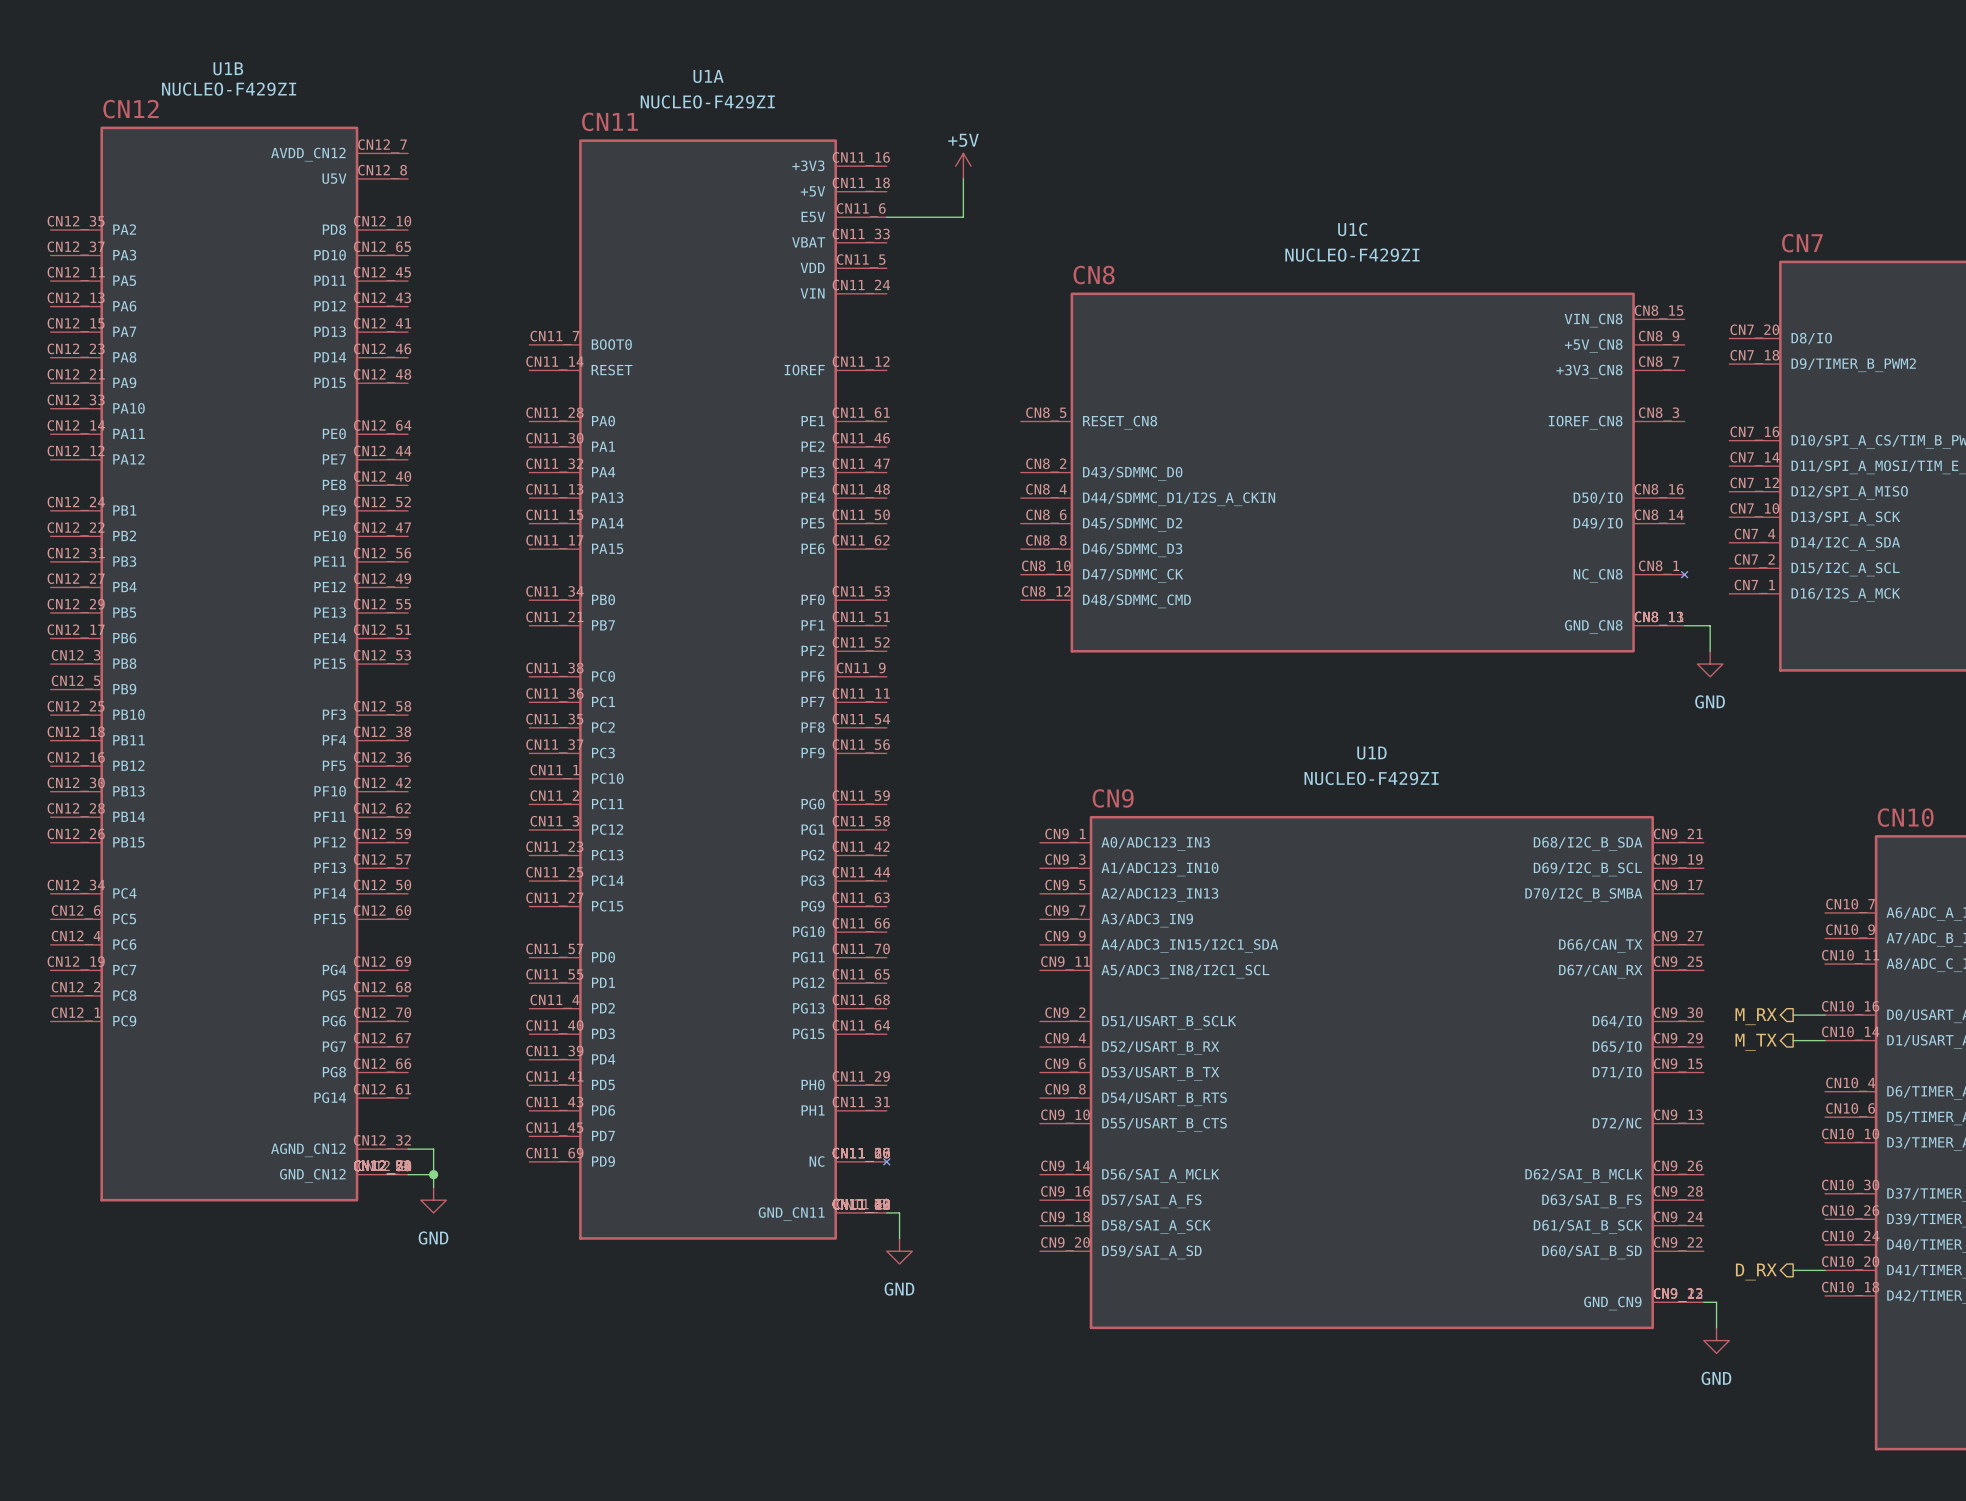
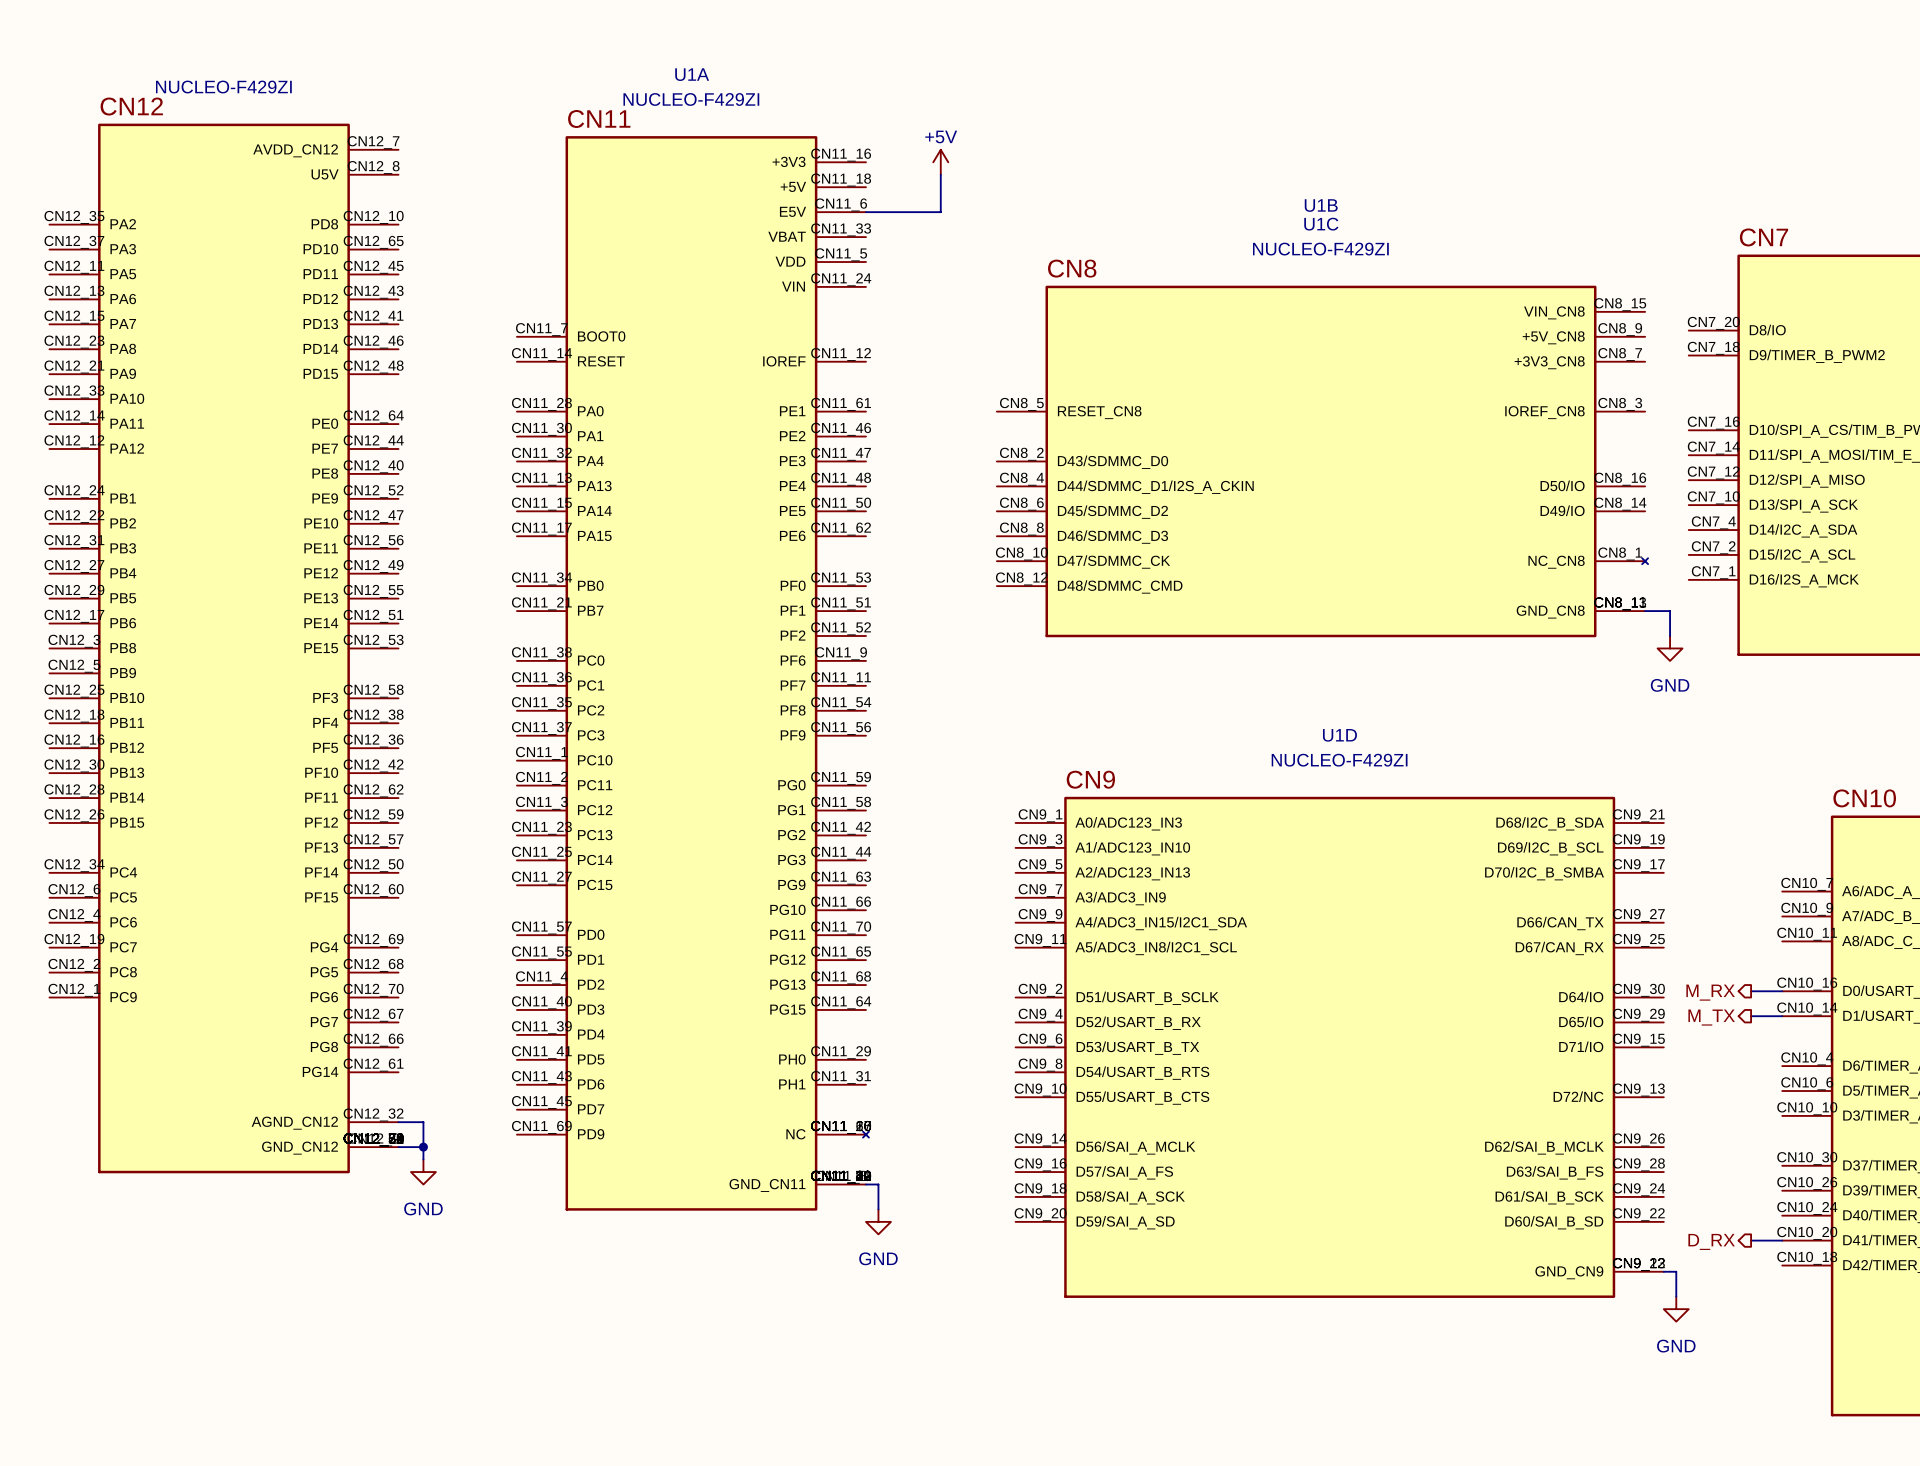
U1B name position: U1B (228, 68) -> U1B (1321, 205)

